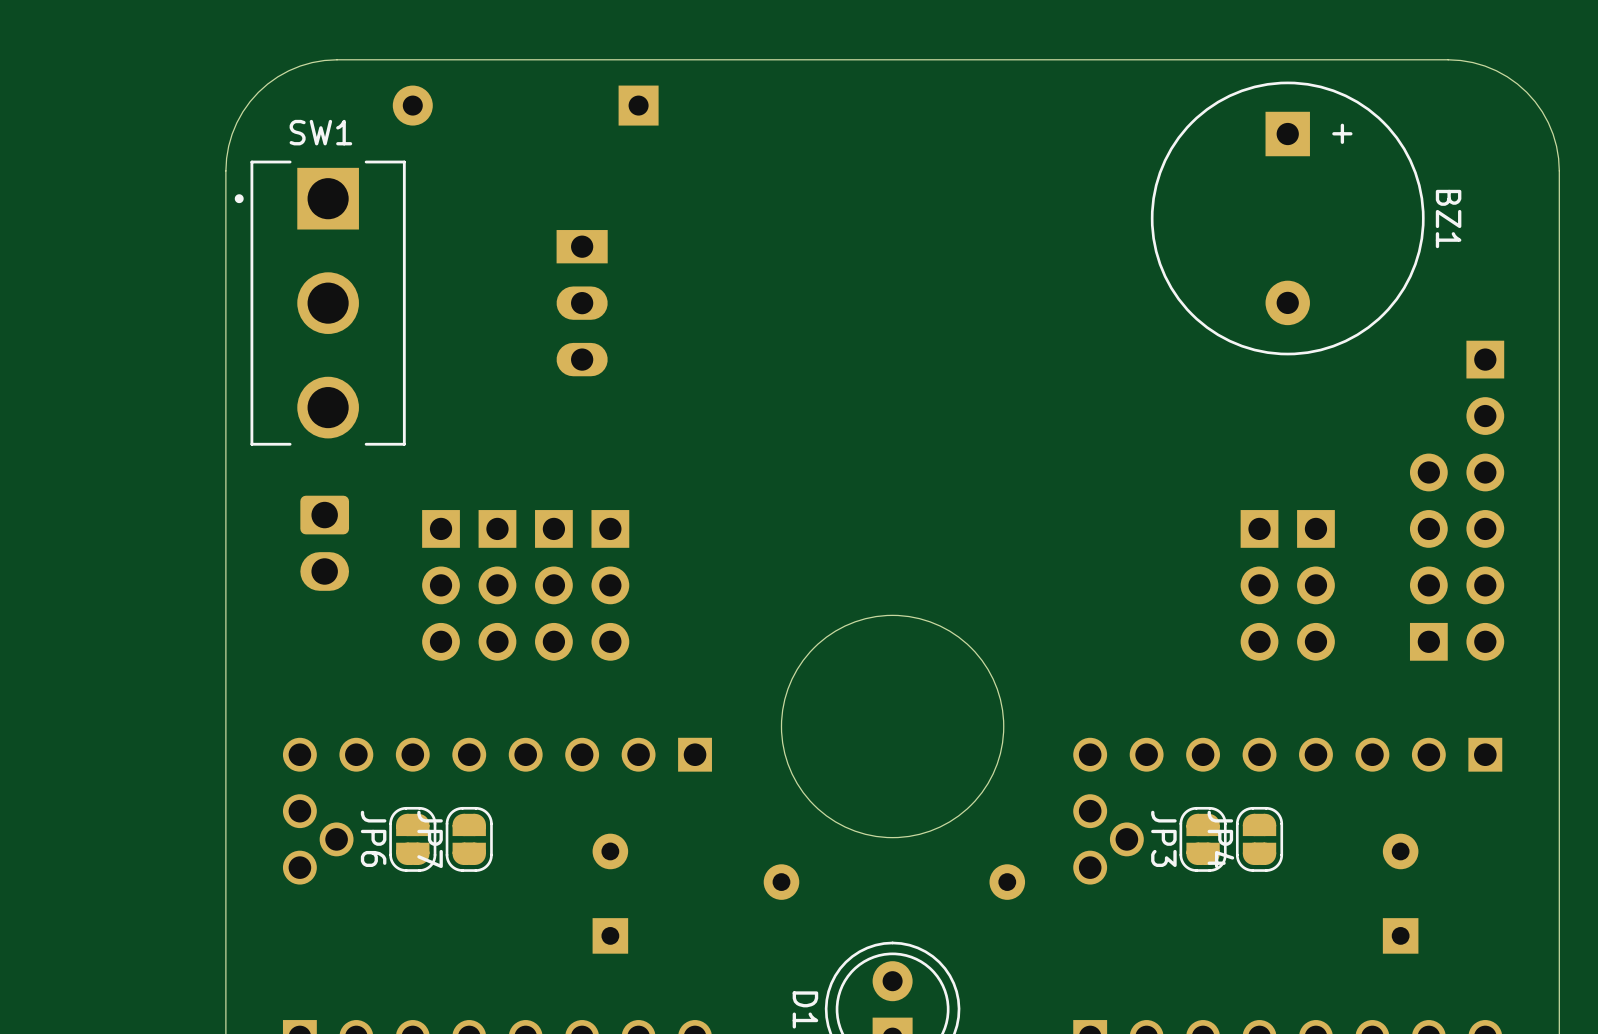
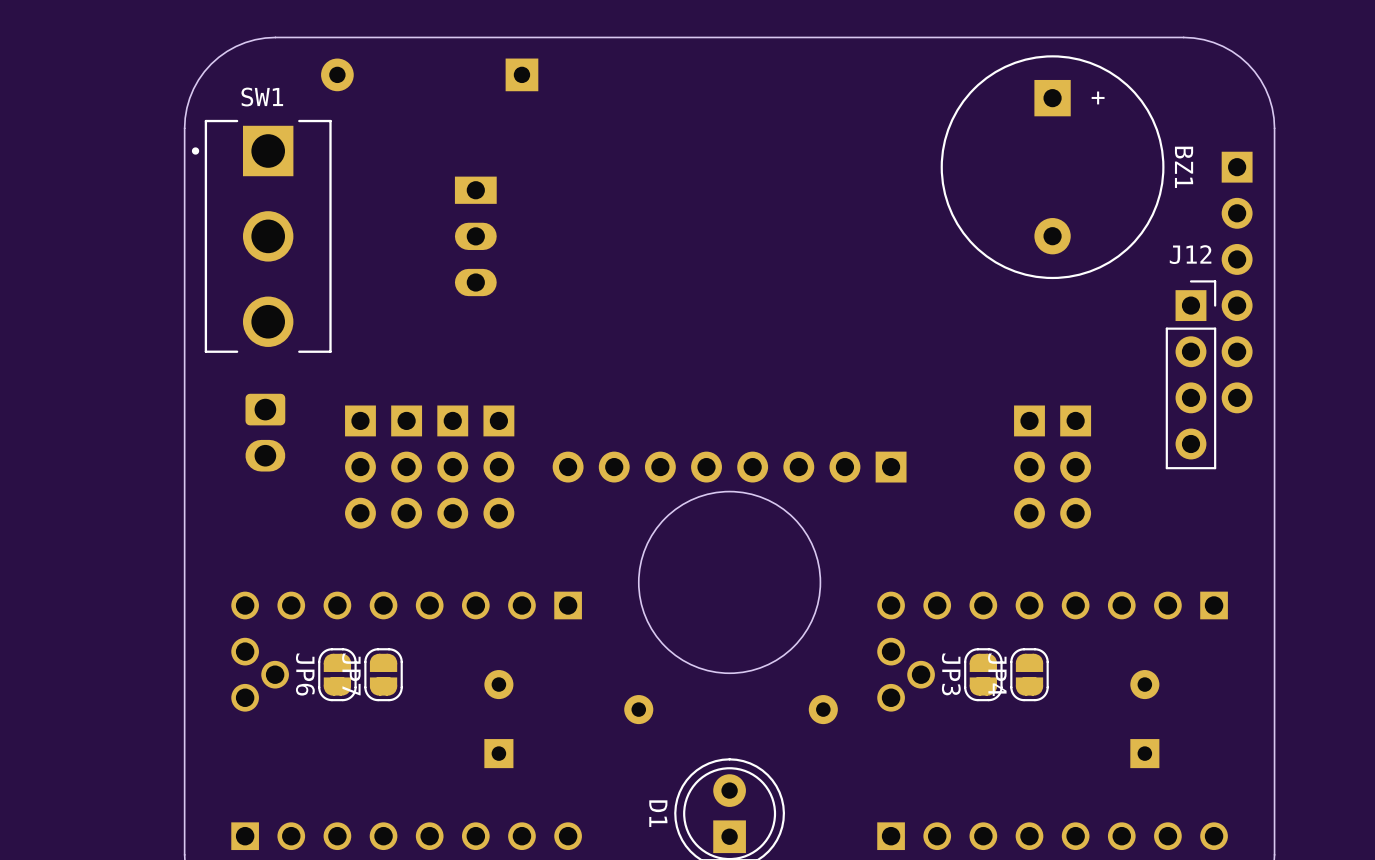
J12: none -> (1190, 374)
part position: (1485, 500) -> (1237, 282)
part: (1428, 557) -> none
part: none -> (729, 467)

